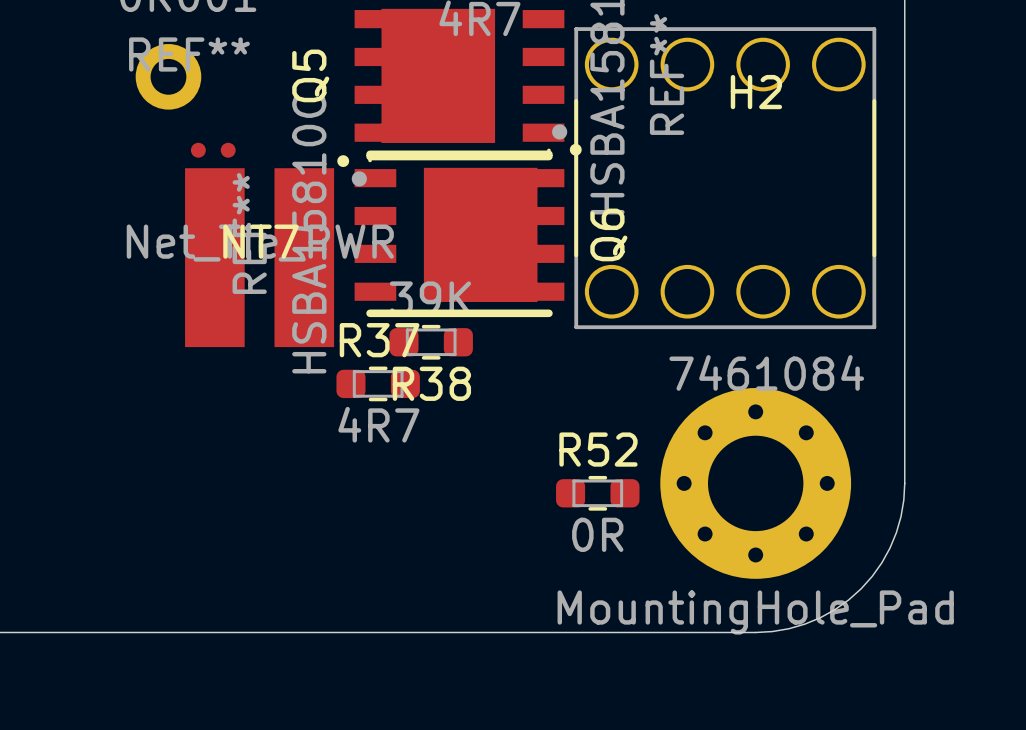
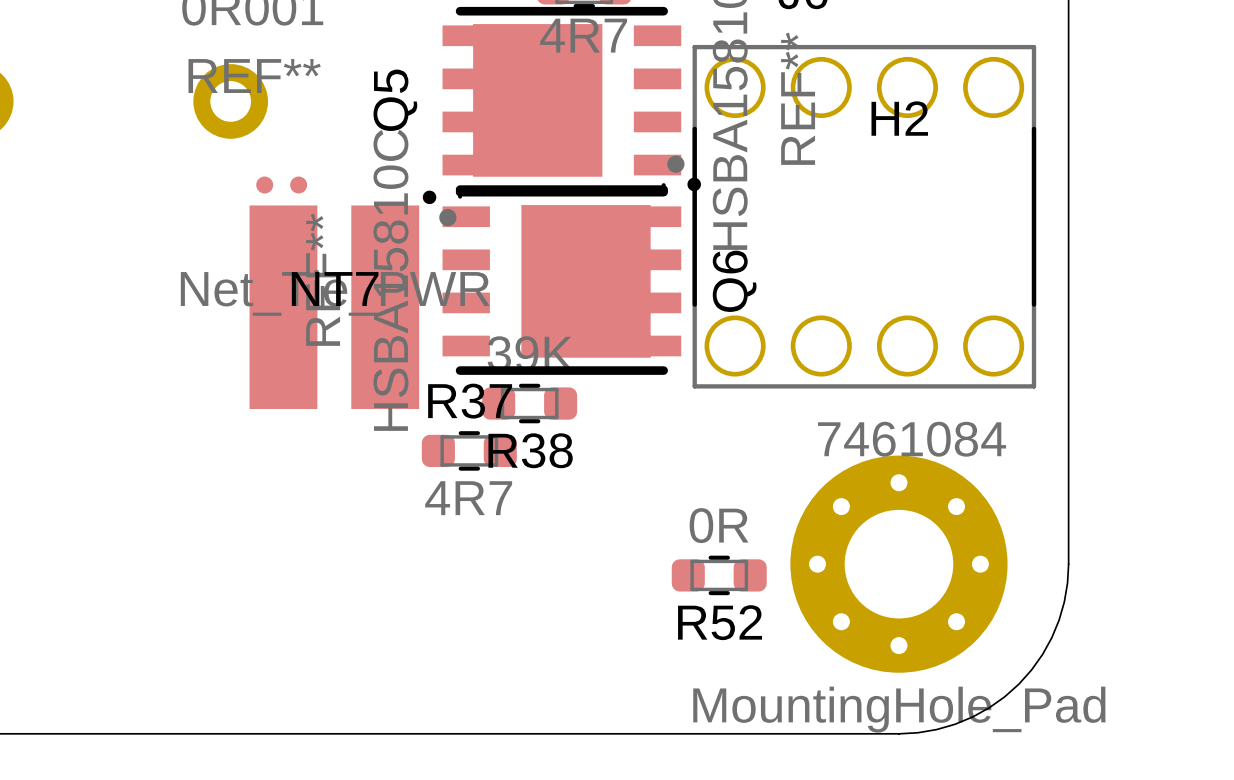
R52 name position: R52 (598, 449) -> R52 (720, 622)
R52 value position: 0R (597, 534) -> 0R (719, 525)

